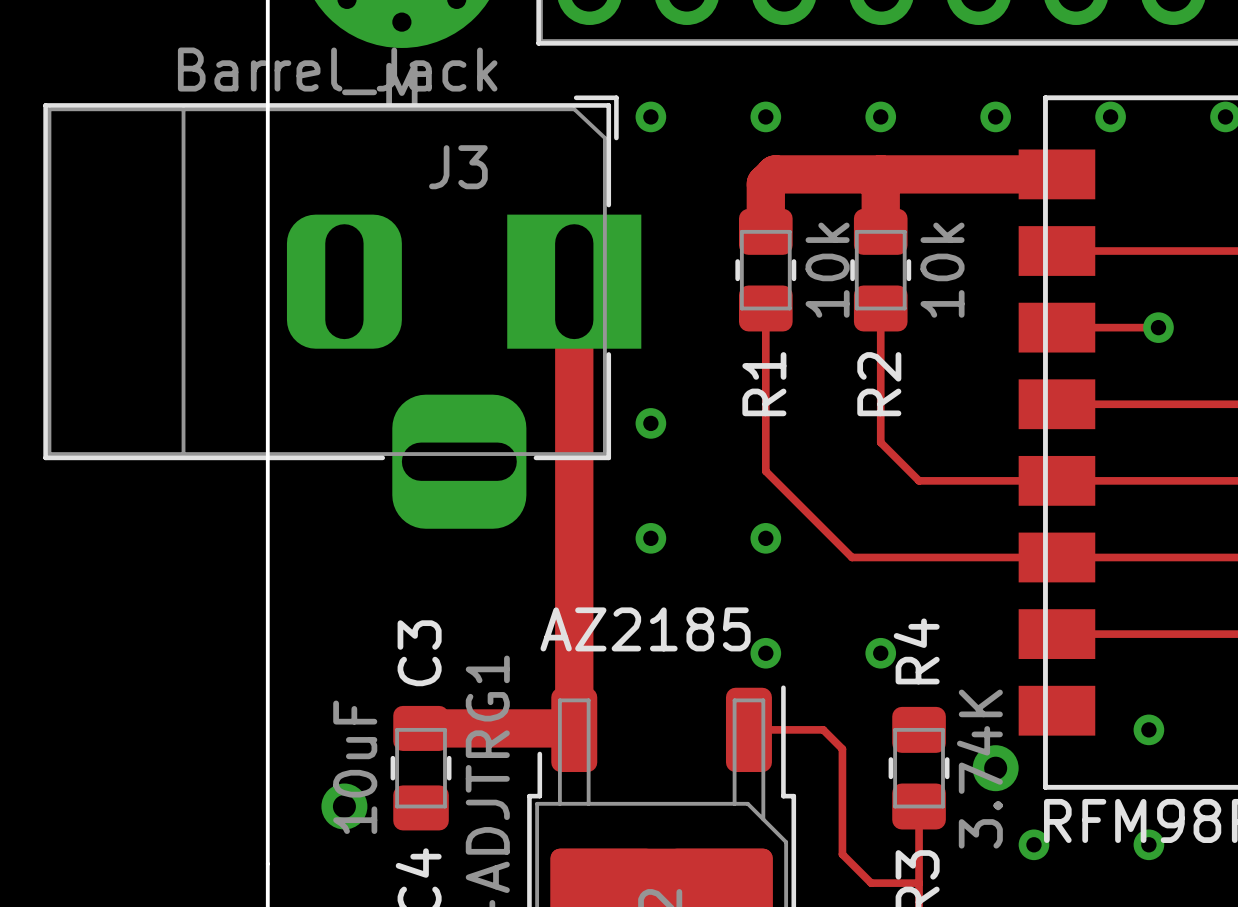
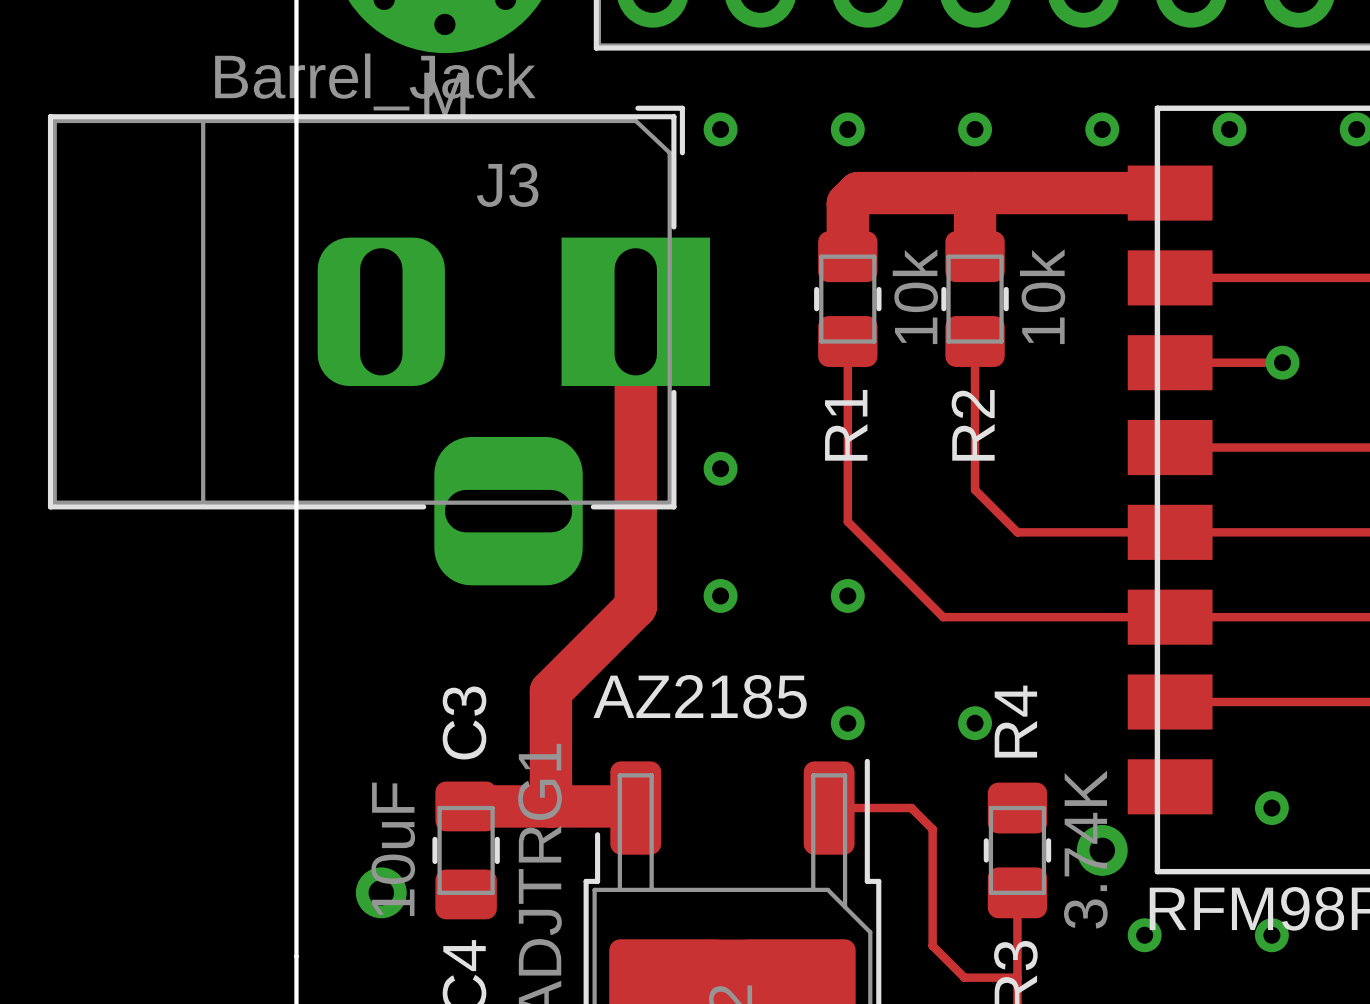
track: (574, 547) (574, 729) -> (635, 606) (550, 691) (550, 806)

